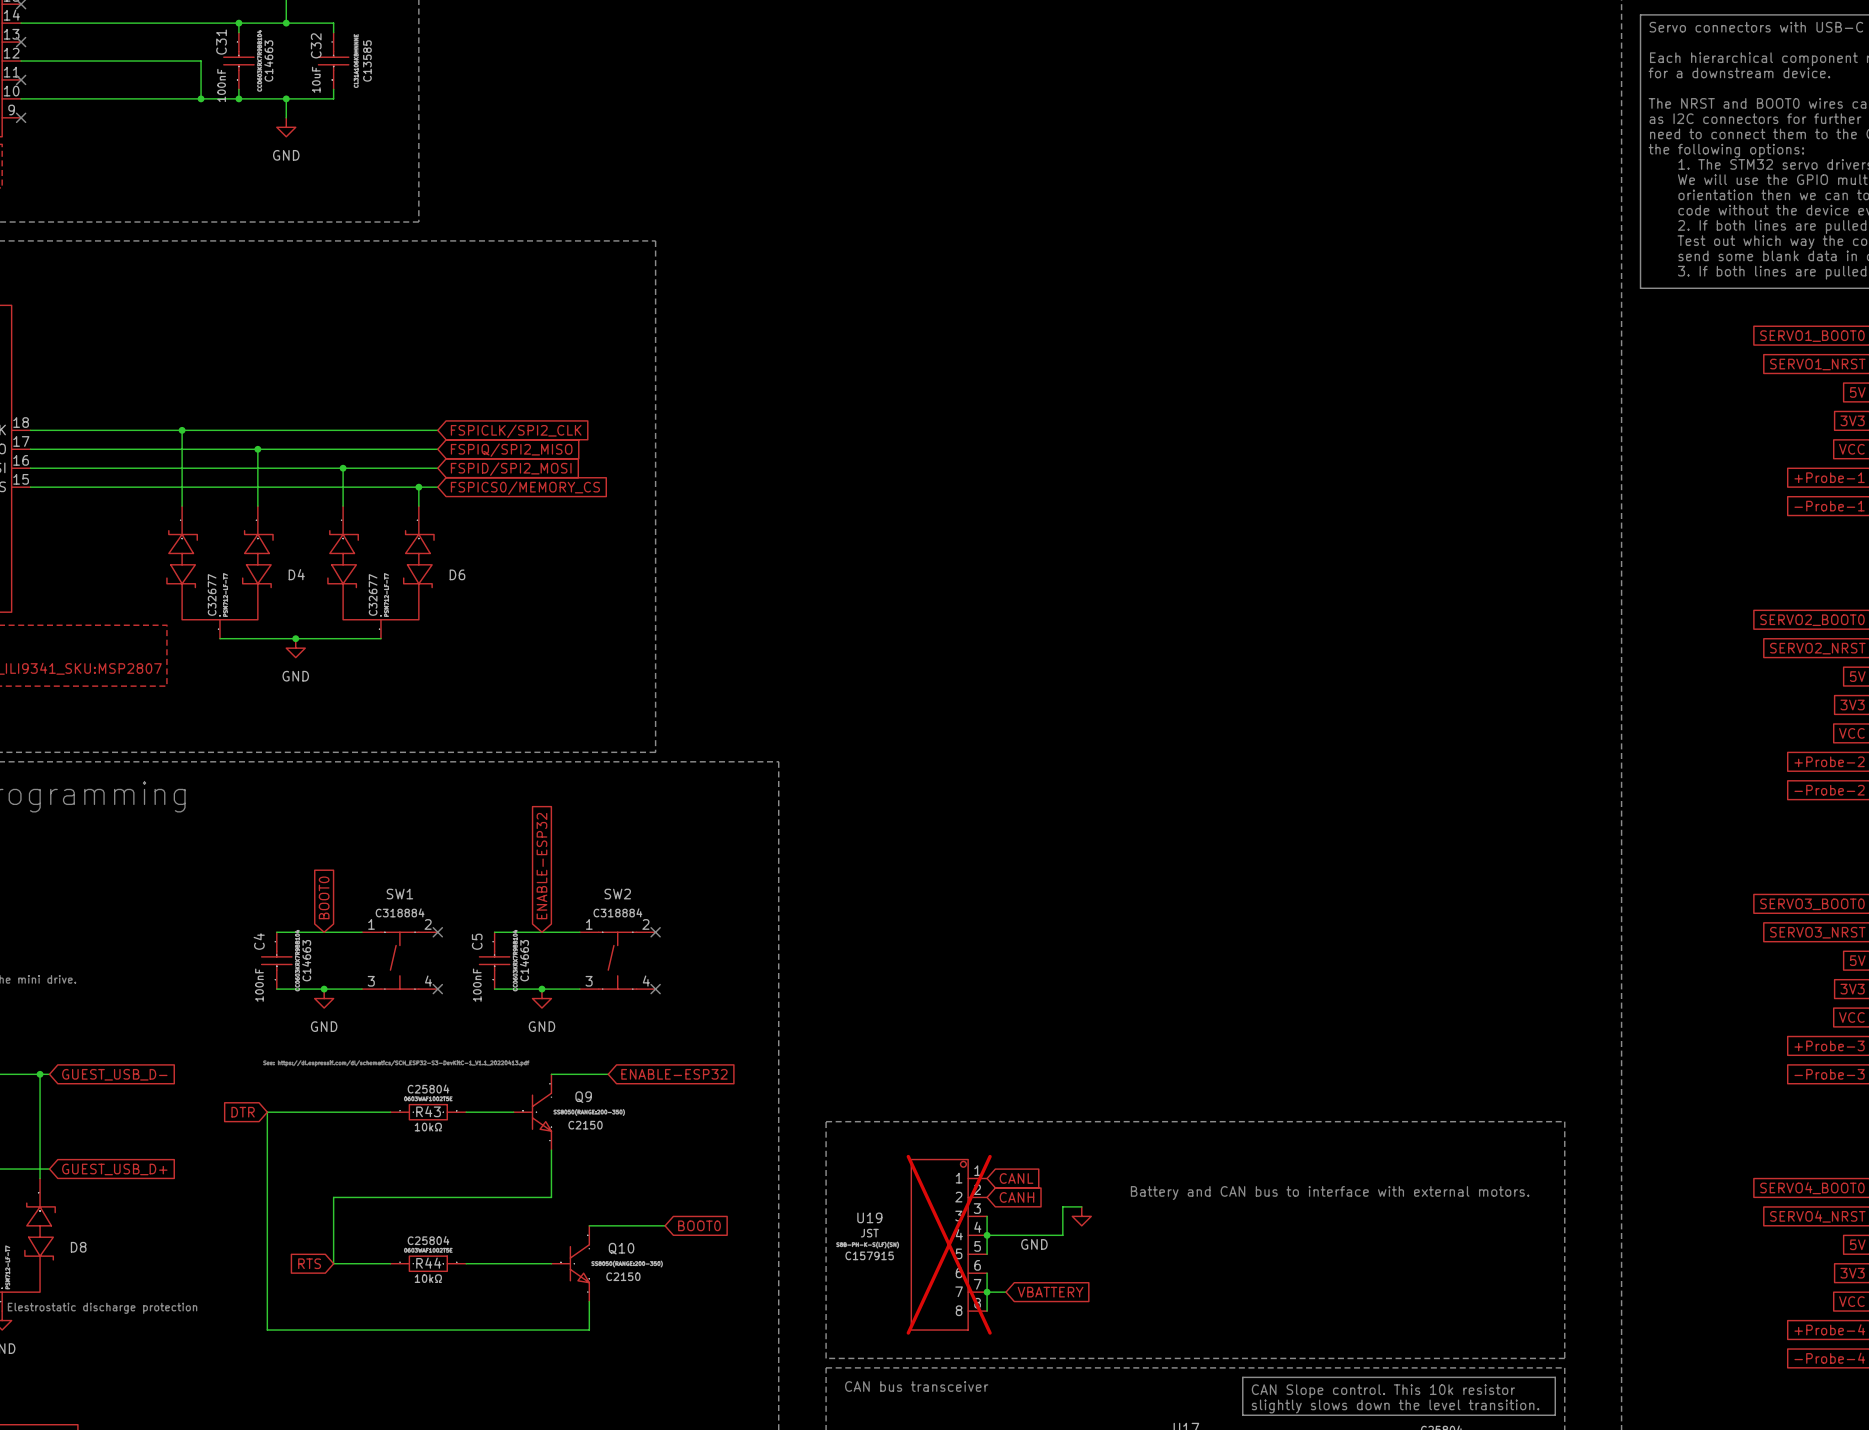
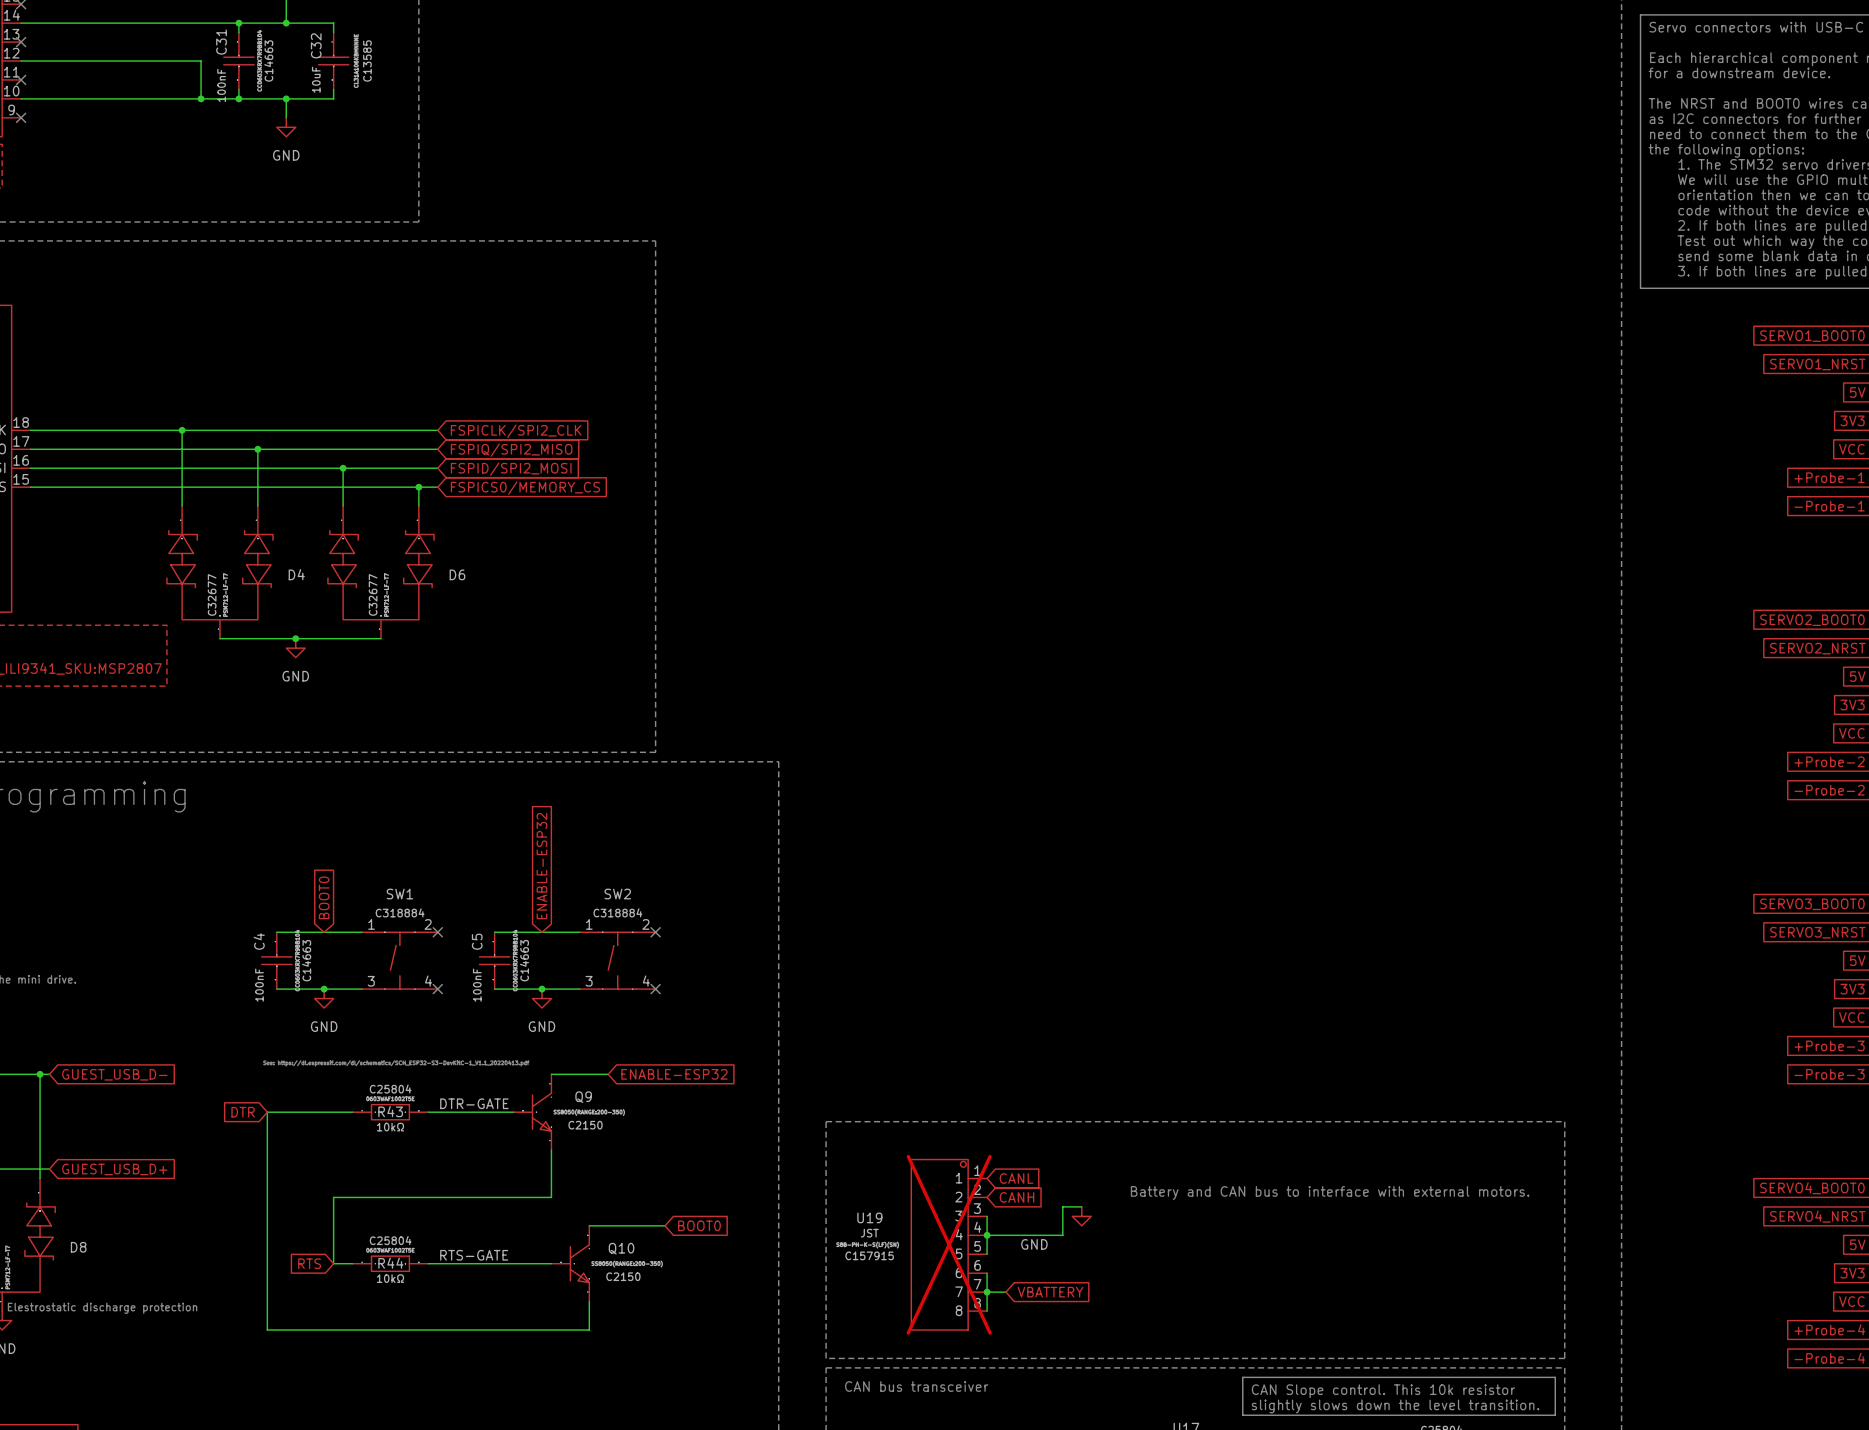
label: none -> DTR-GATE (474, 1103)
R43 position: (428, 1112) -> (390, 1112)
label: none -> RTS-GATE (474, 1255)
R44 position: (428, 1263) -> (390, 1263)

